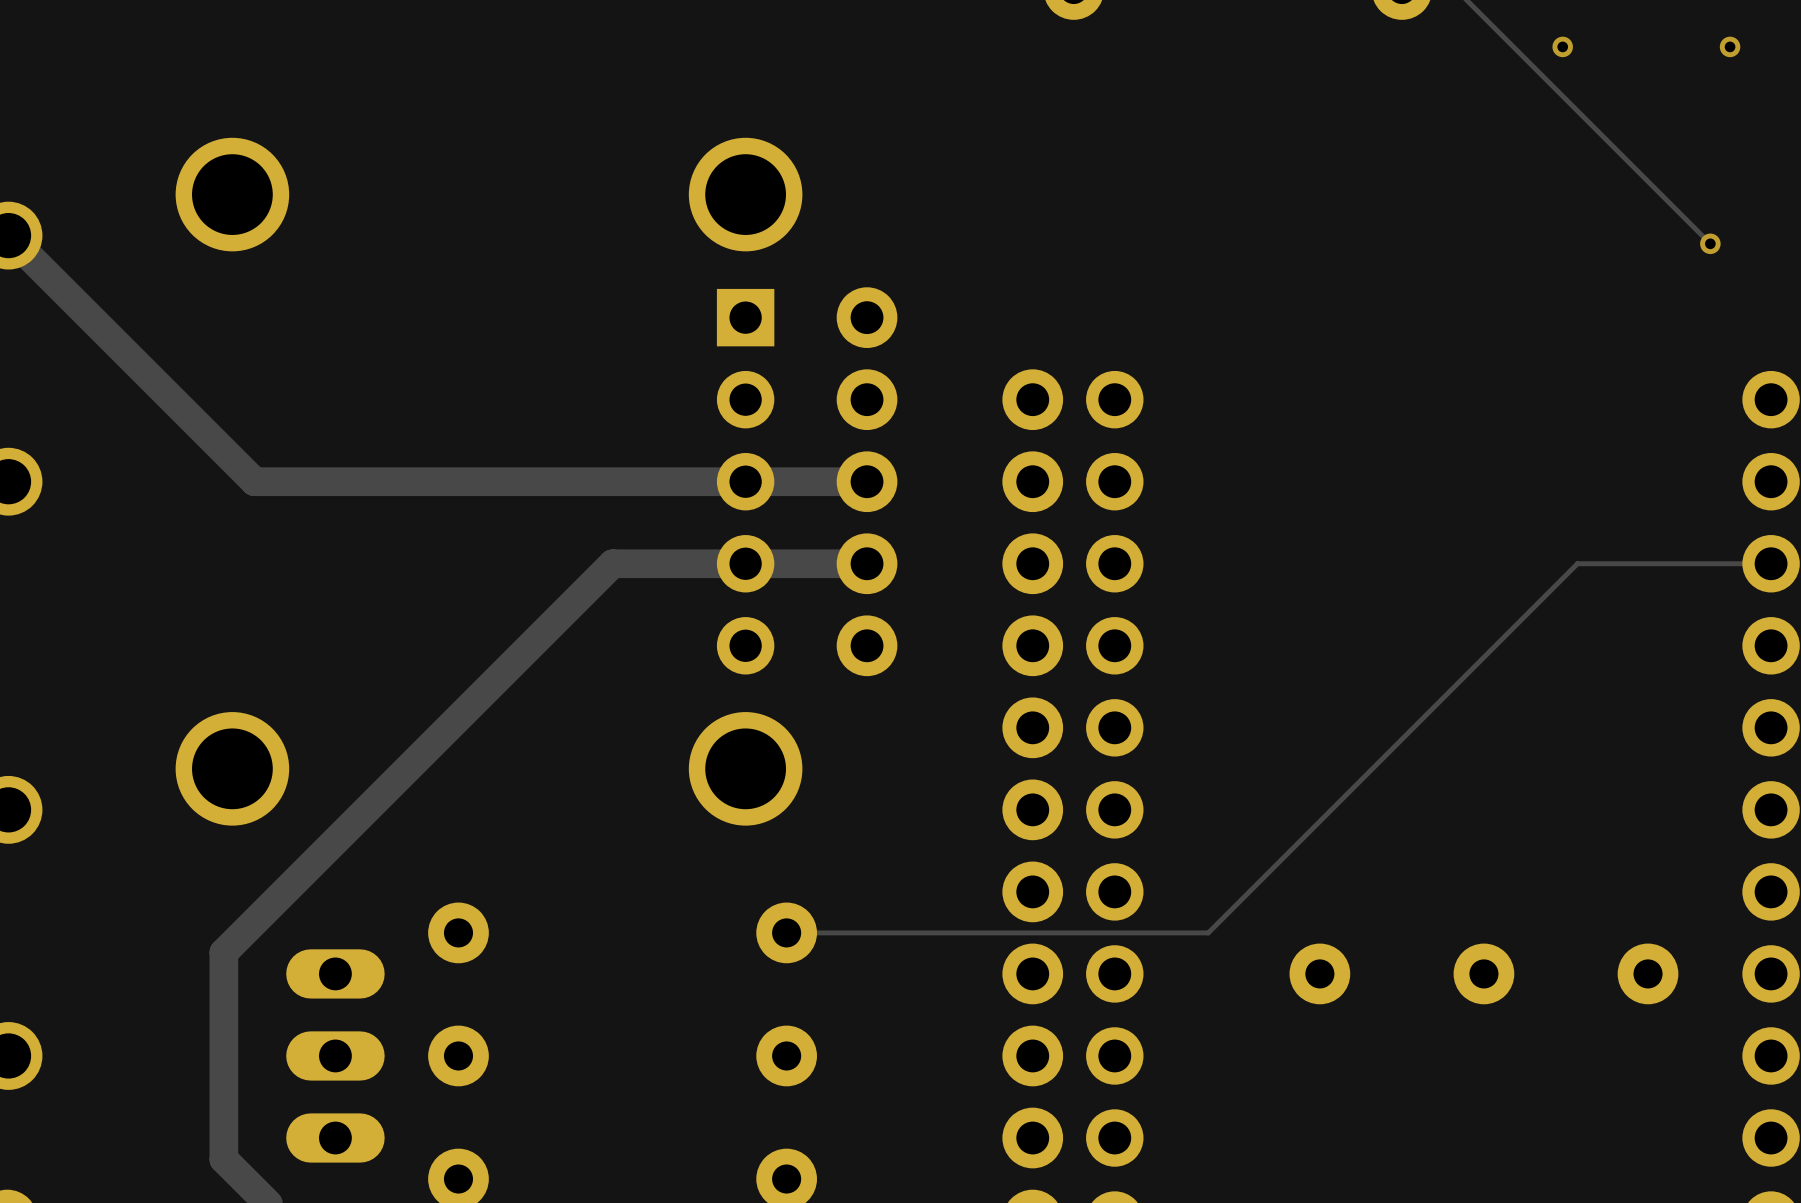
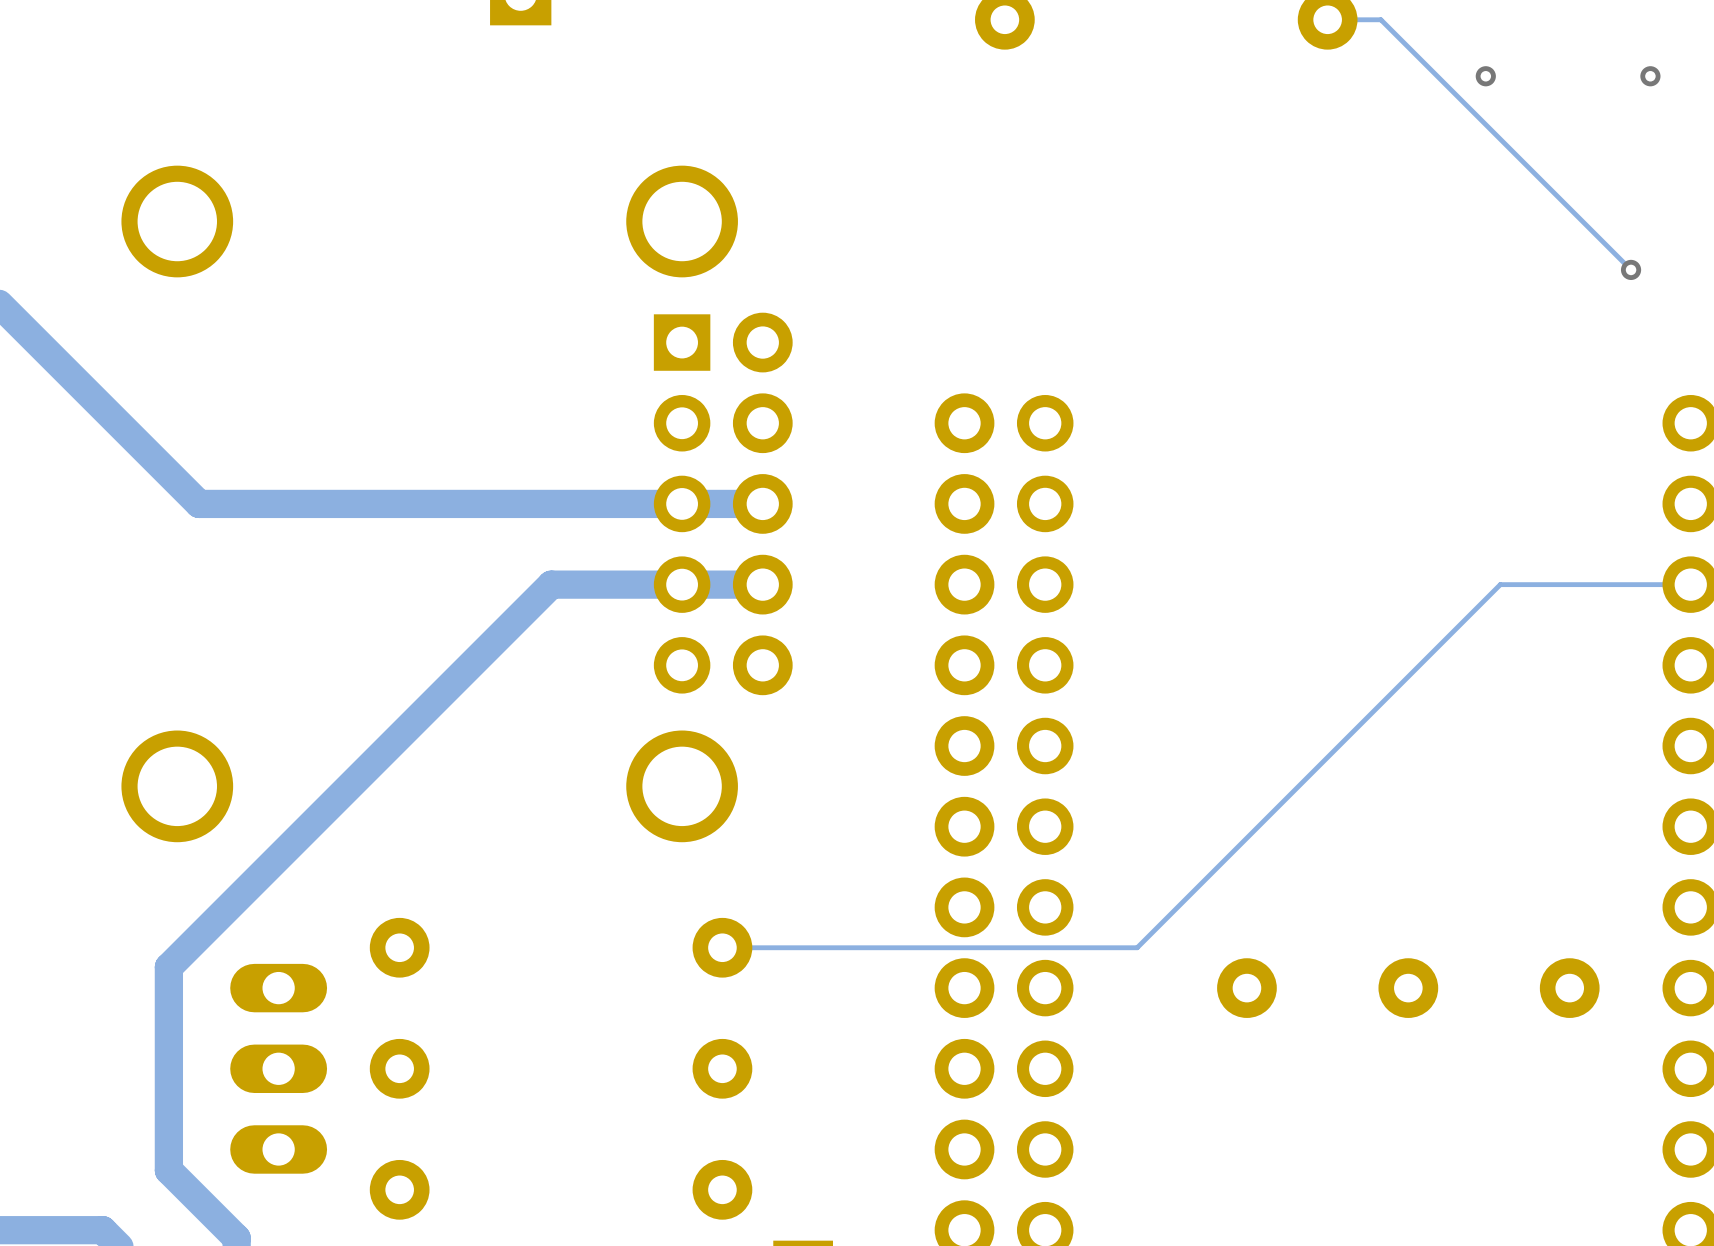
part position: (867, 481) -> (762, 503)

